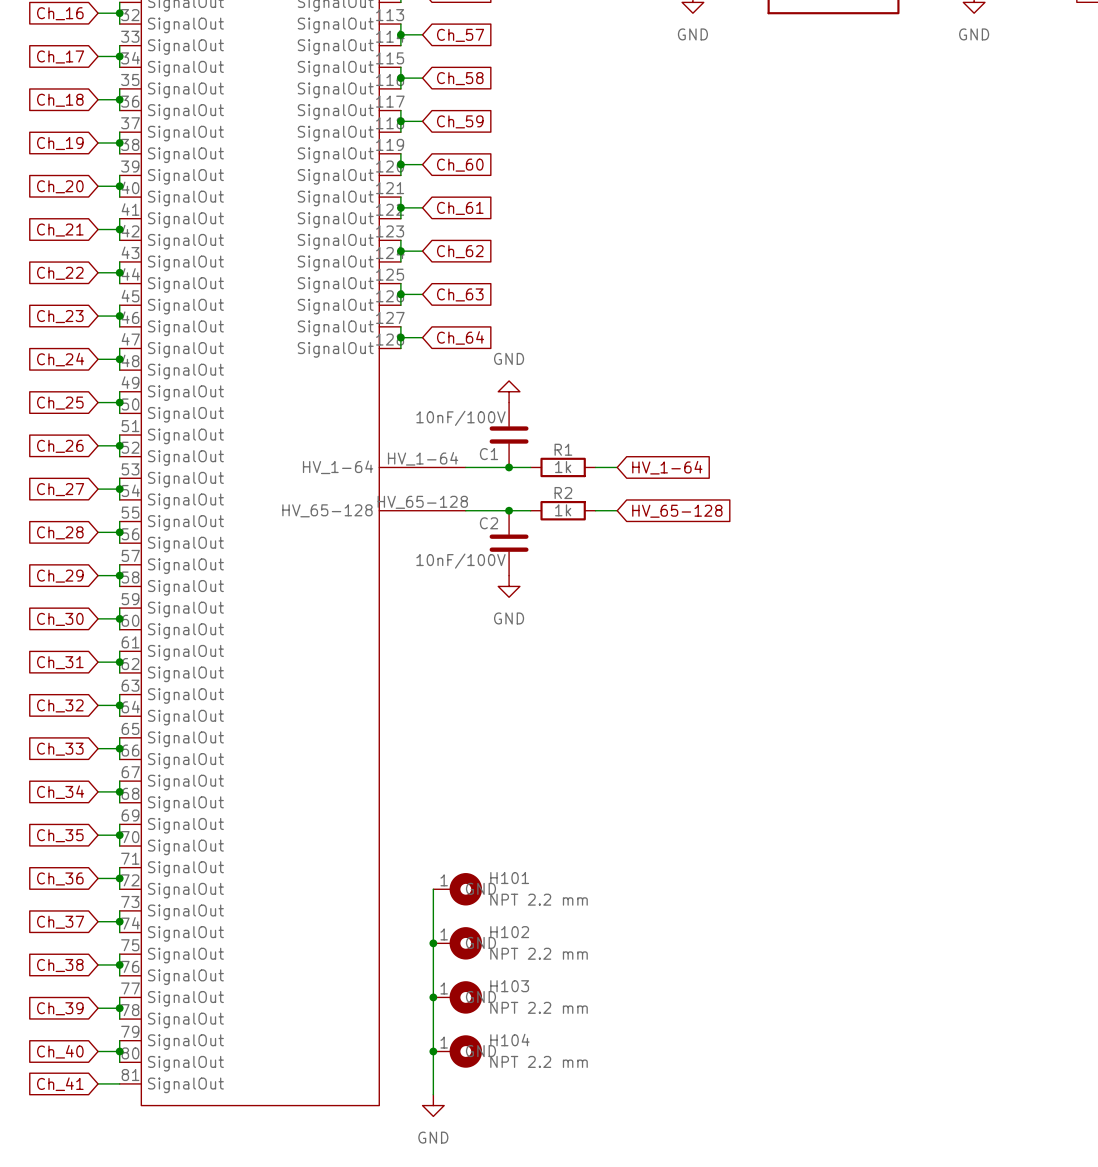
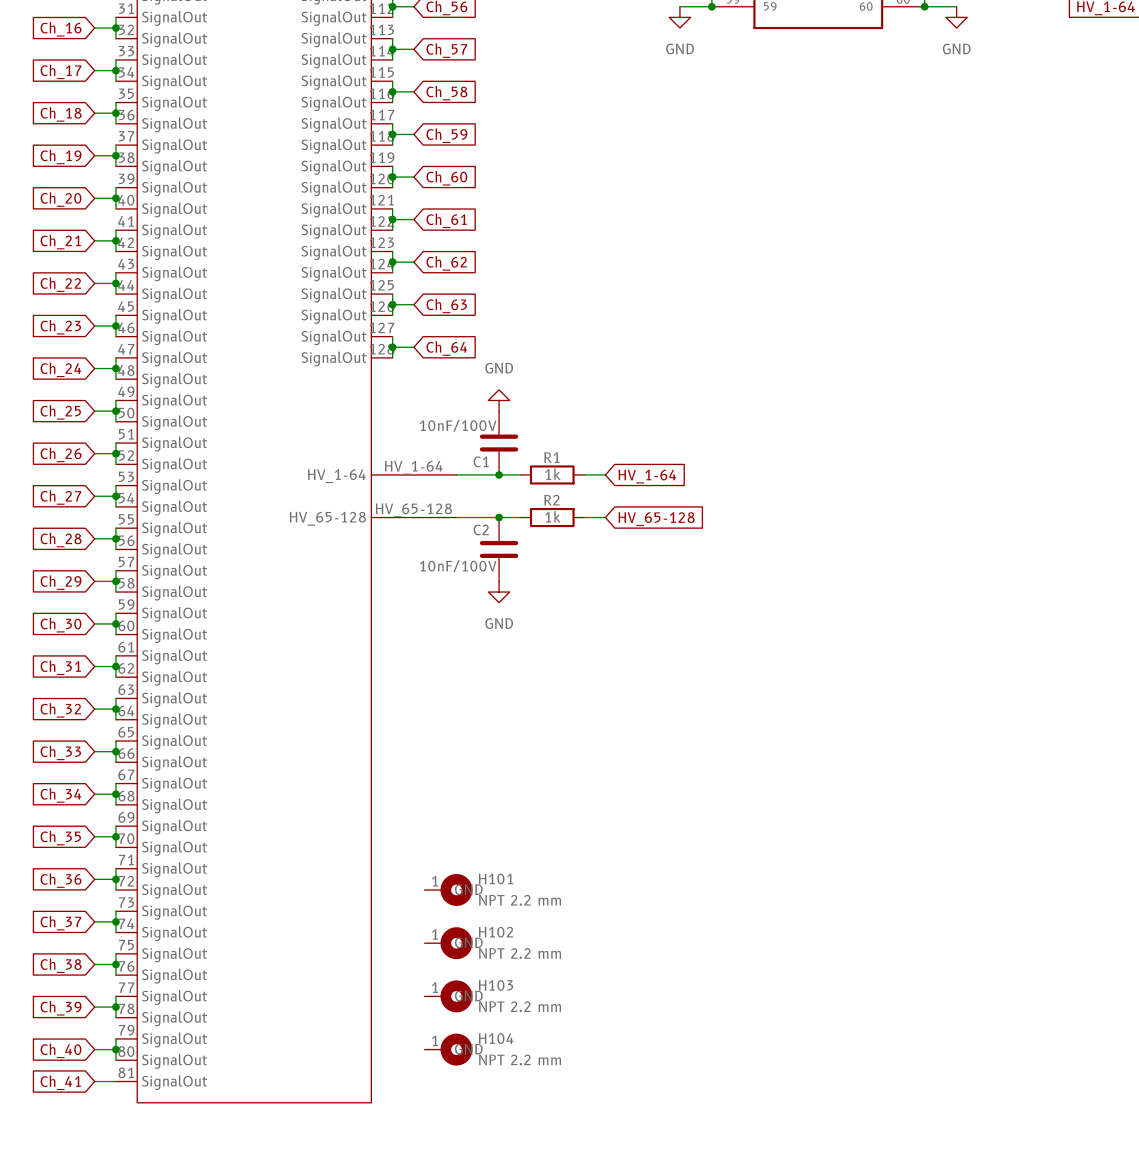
wire: (433, 889) (433, 1094) -> none
junction: (433, 943) -> none
junction: (433, 997) -> none
junction: (433, 1051) -> none
power symbol: GND (433, 1105) -> none

